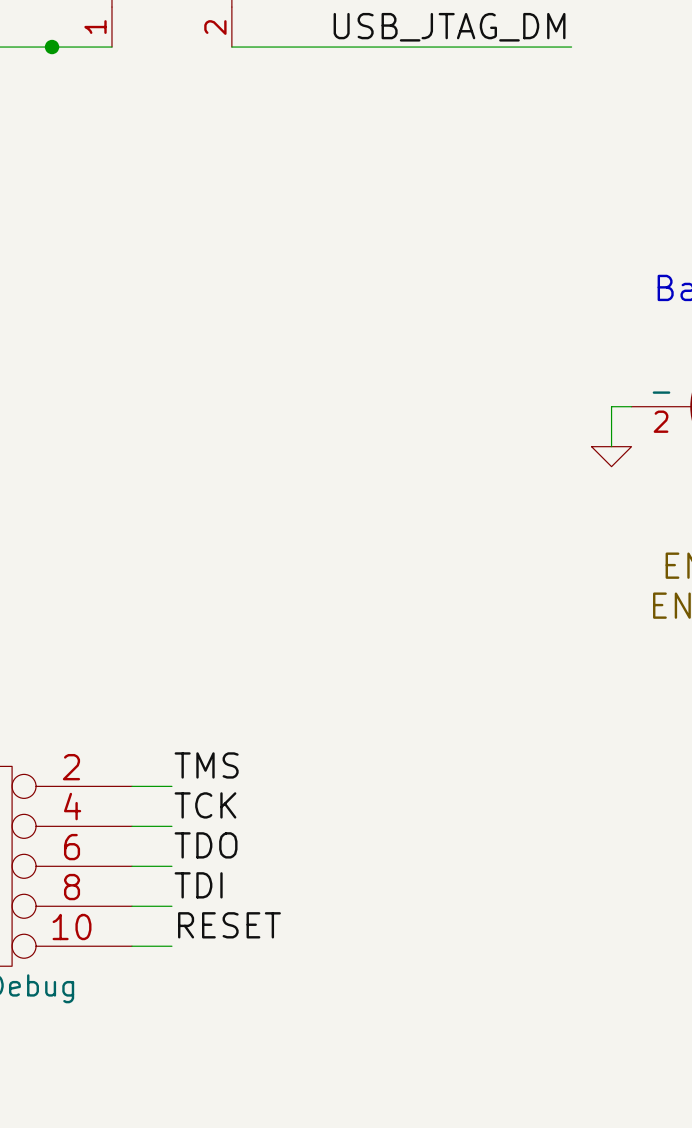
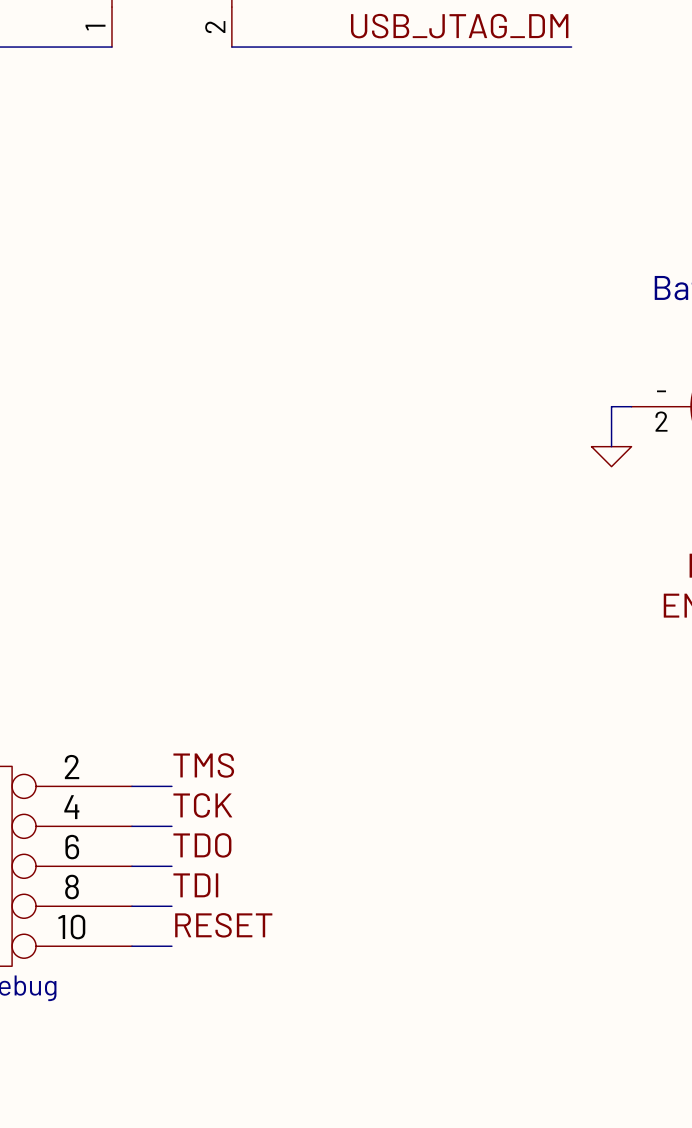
junction: (52, 47) -> none

